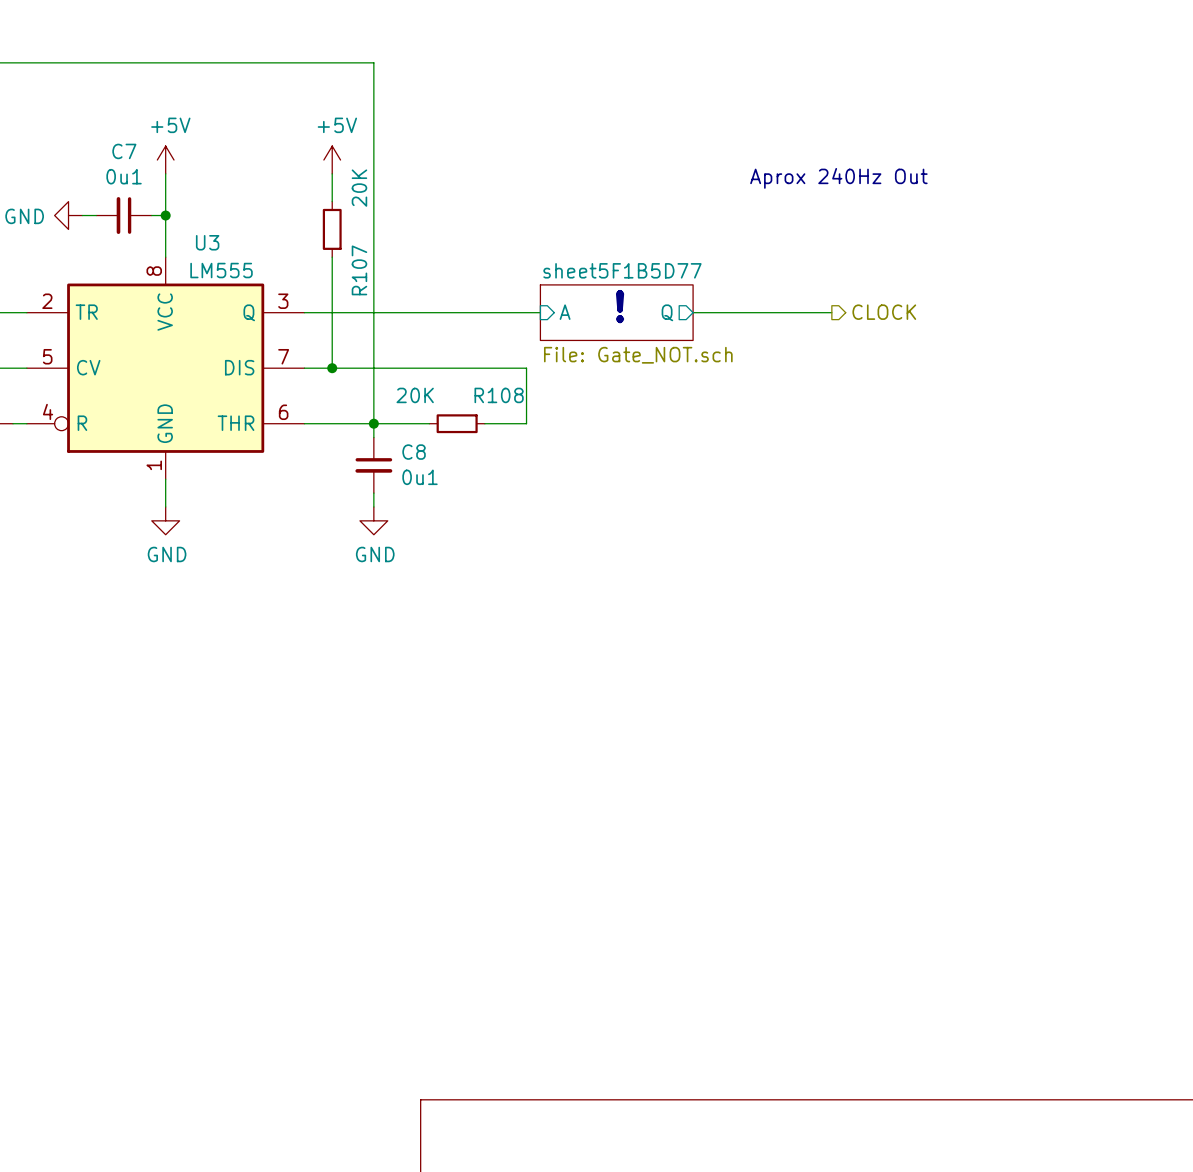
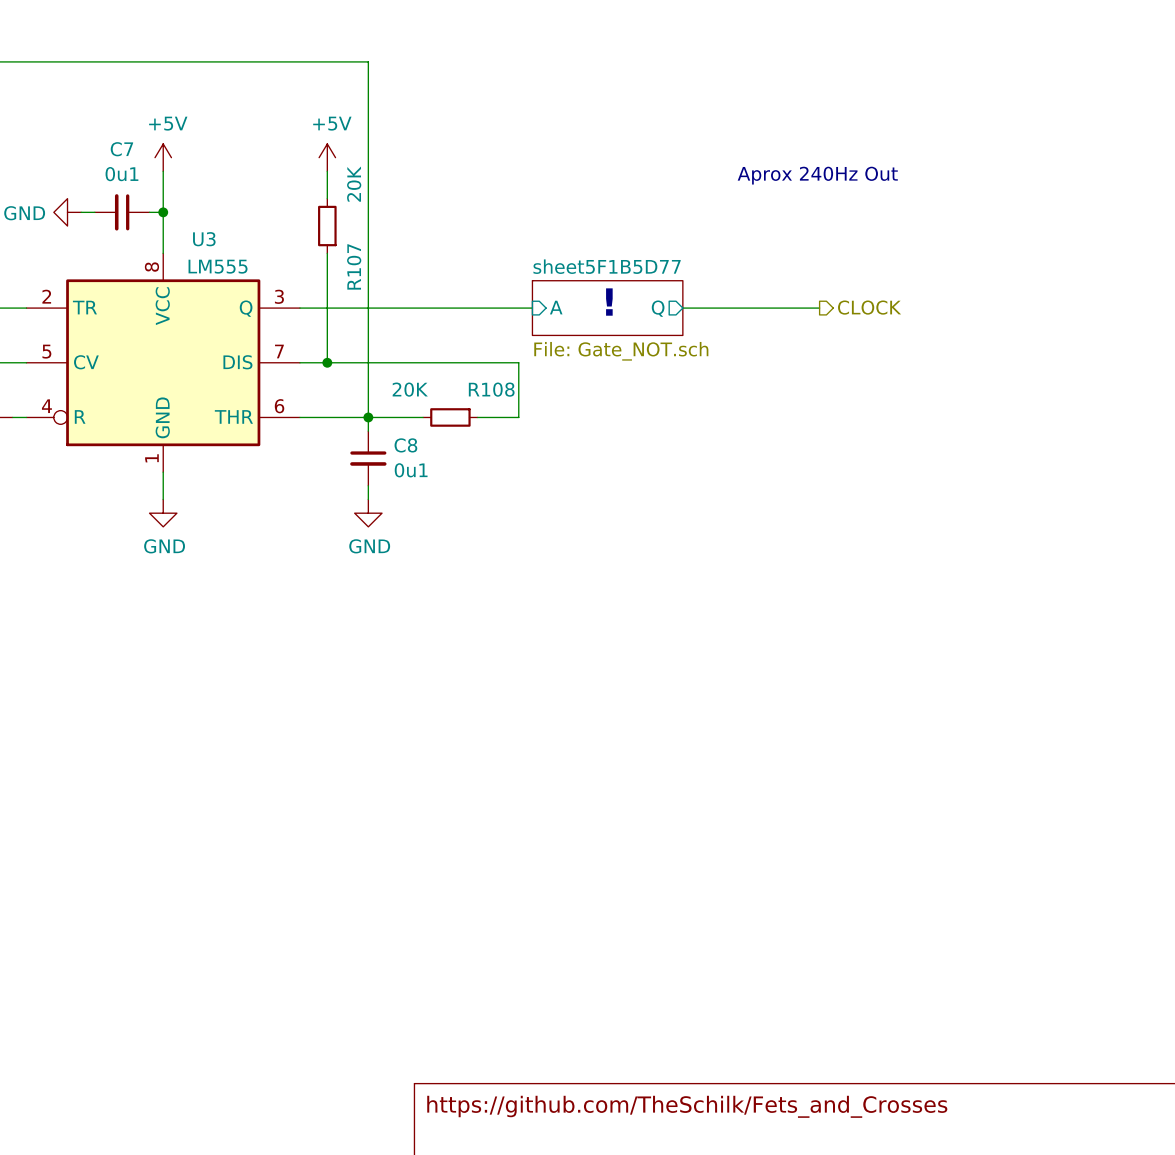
title block: none -> https://github.com/TheSchilk/Fets_and_Crosses (687, 1106)

